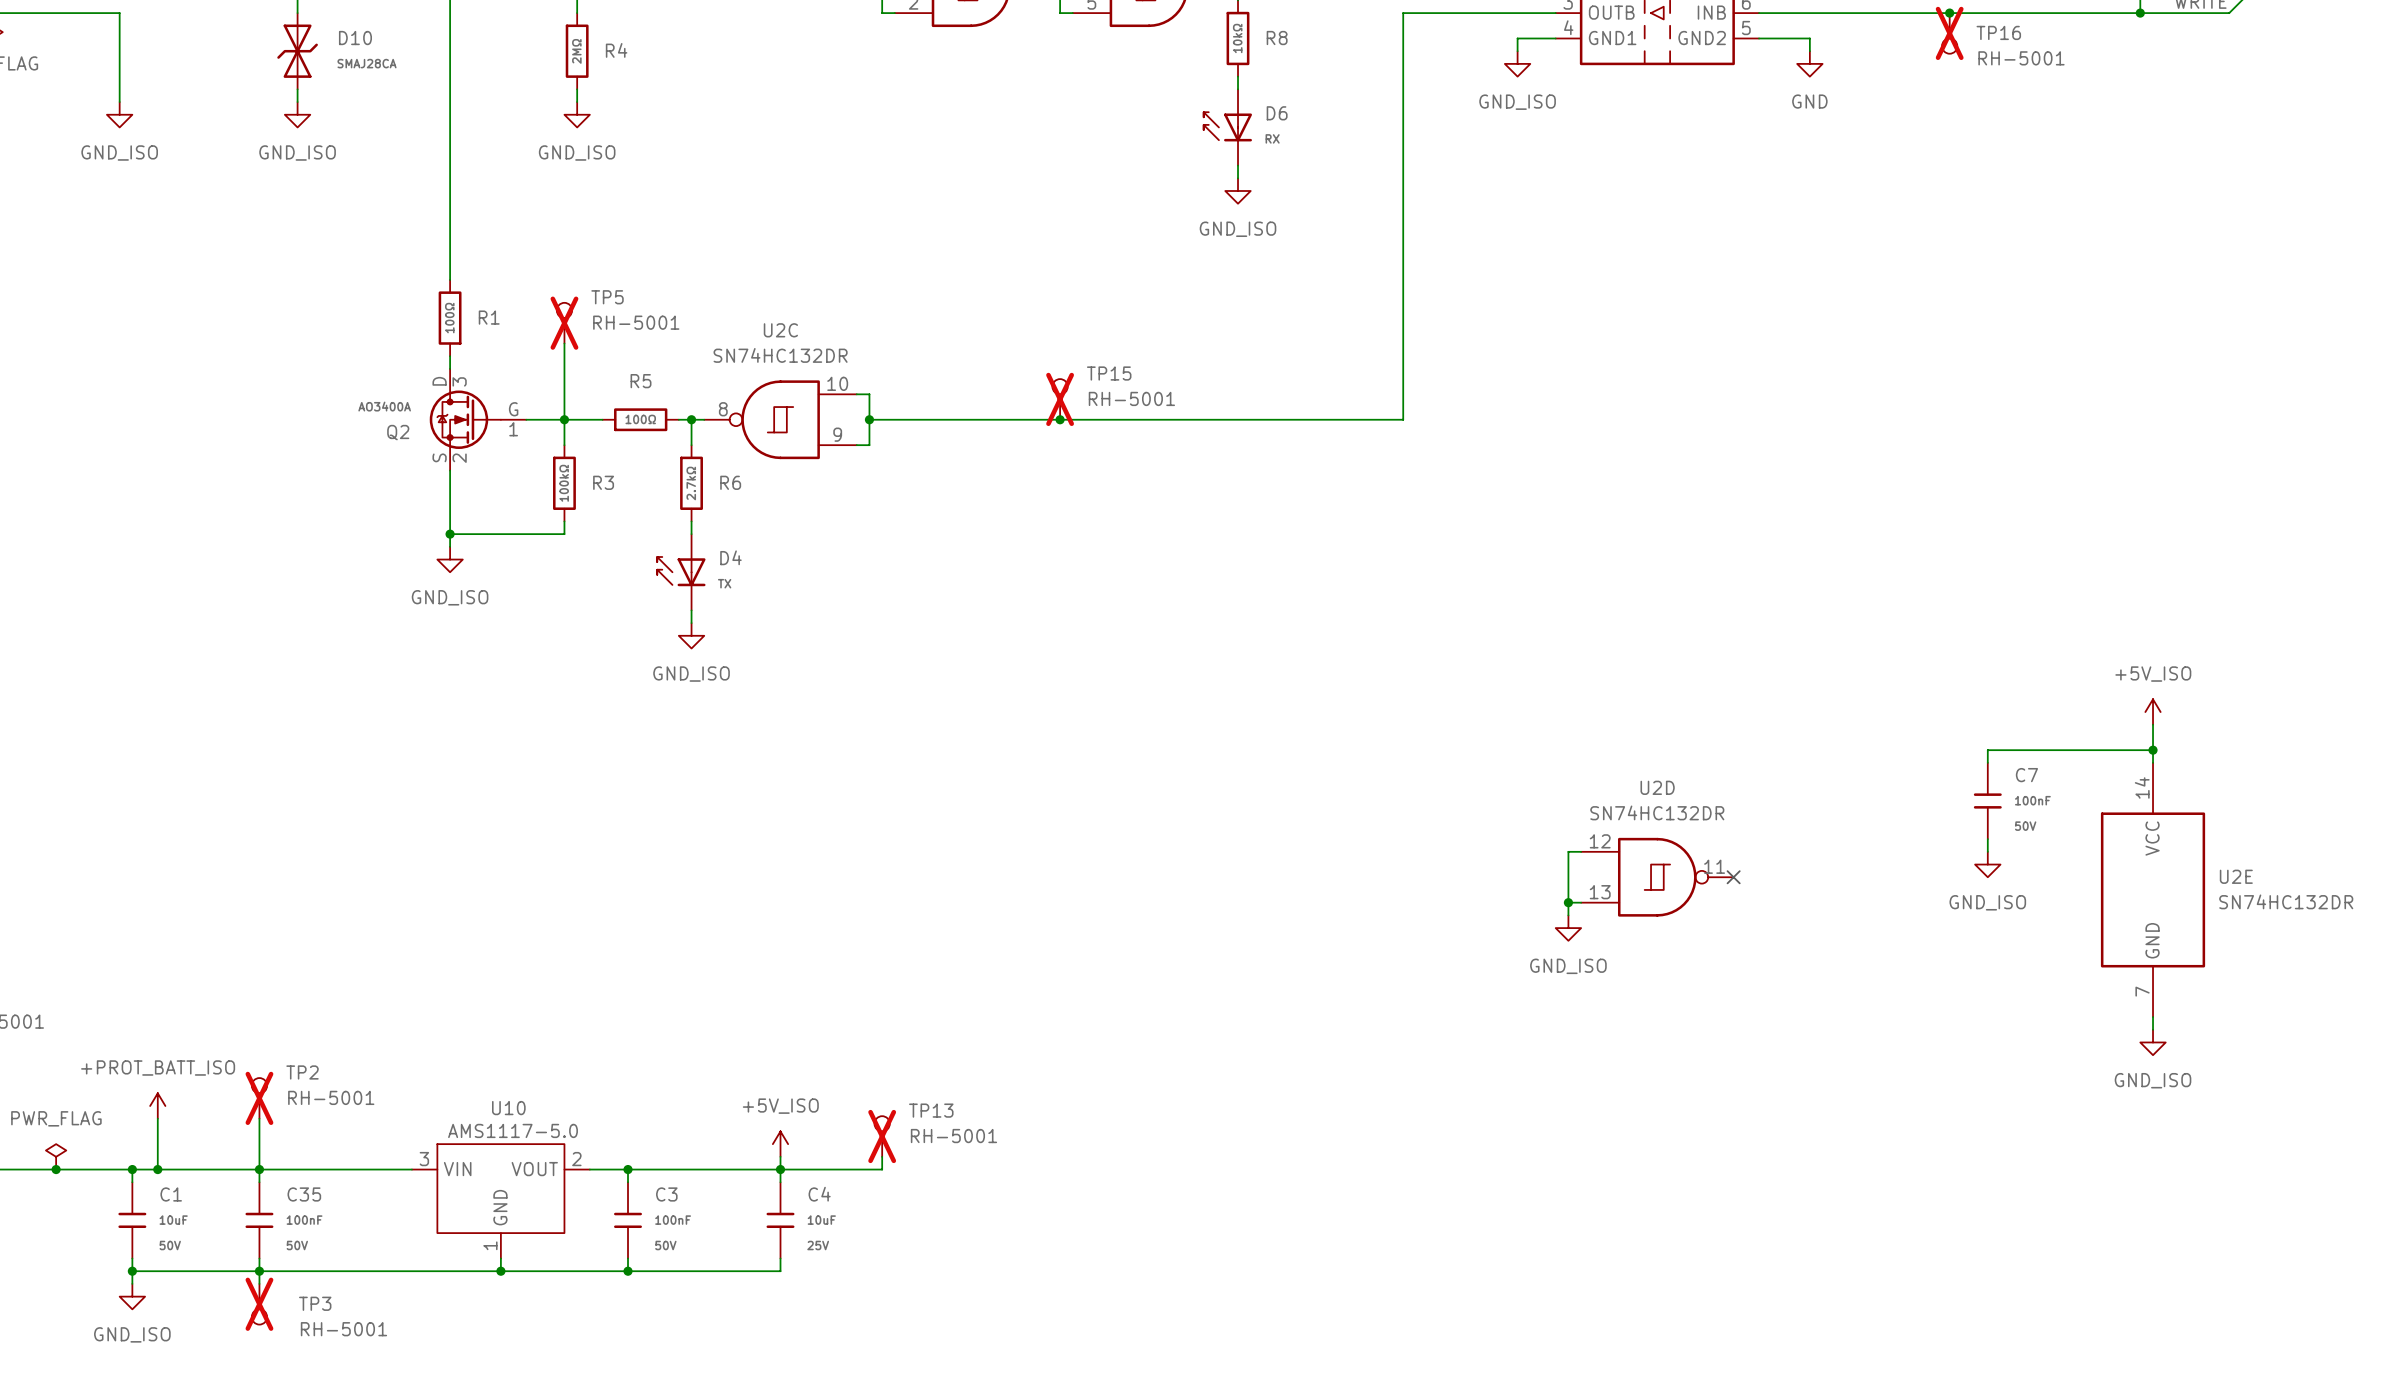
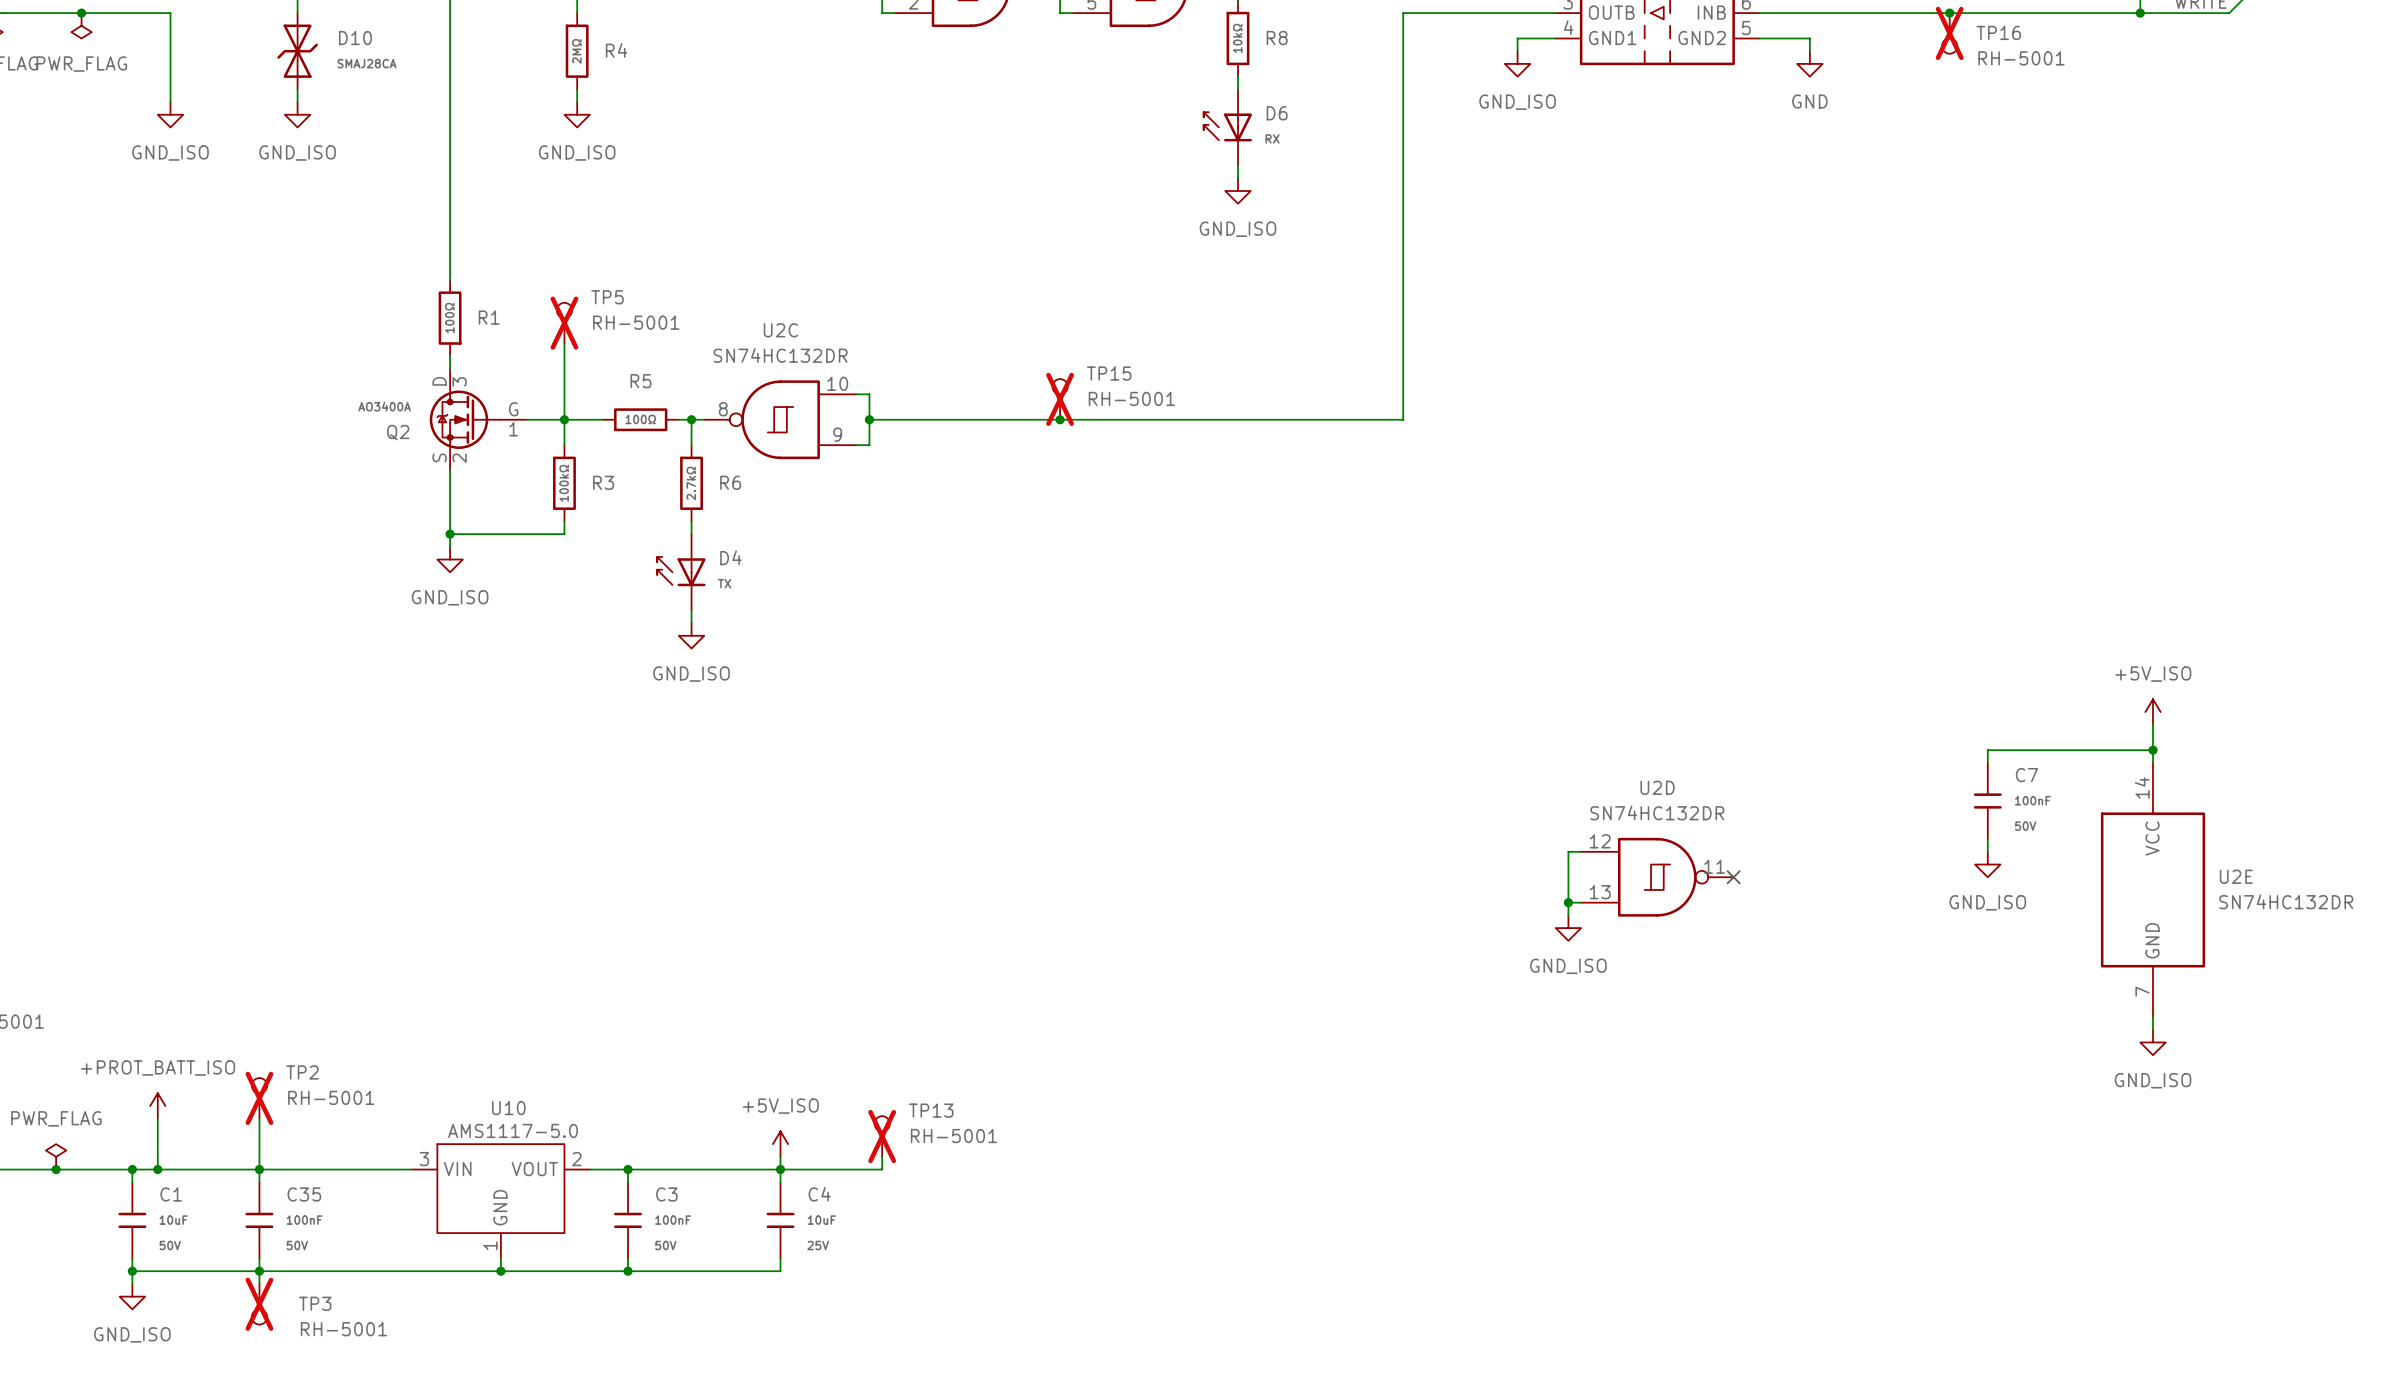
junction: none -> (81, 13)
wire: (119, 13) (119, 102) -> (119, 13) (170, 13) (170, 102)
power symbol: none -> PWR_FLAG (81, 25)
power symbol position: GND_ISO (119, 114) -> GND_ISO (170, 114)

